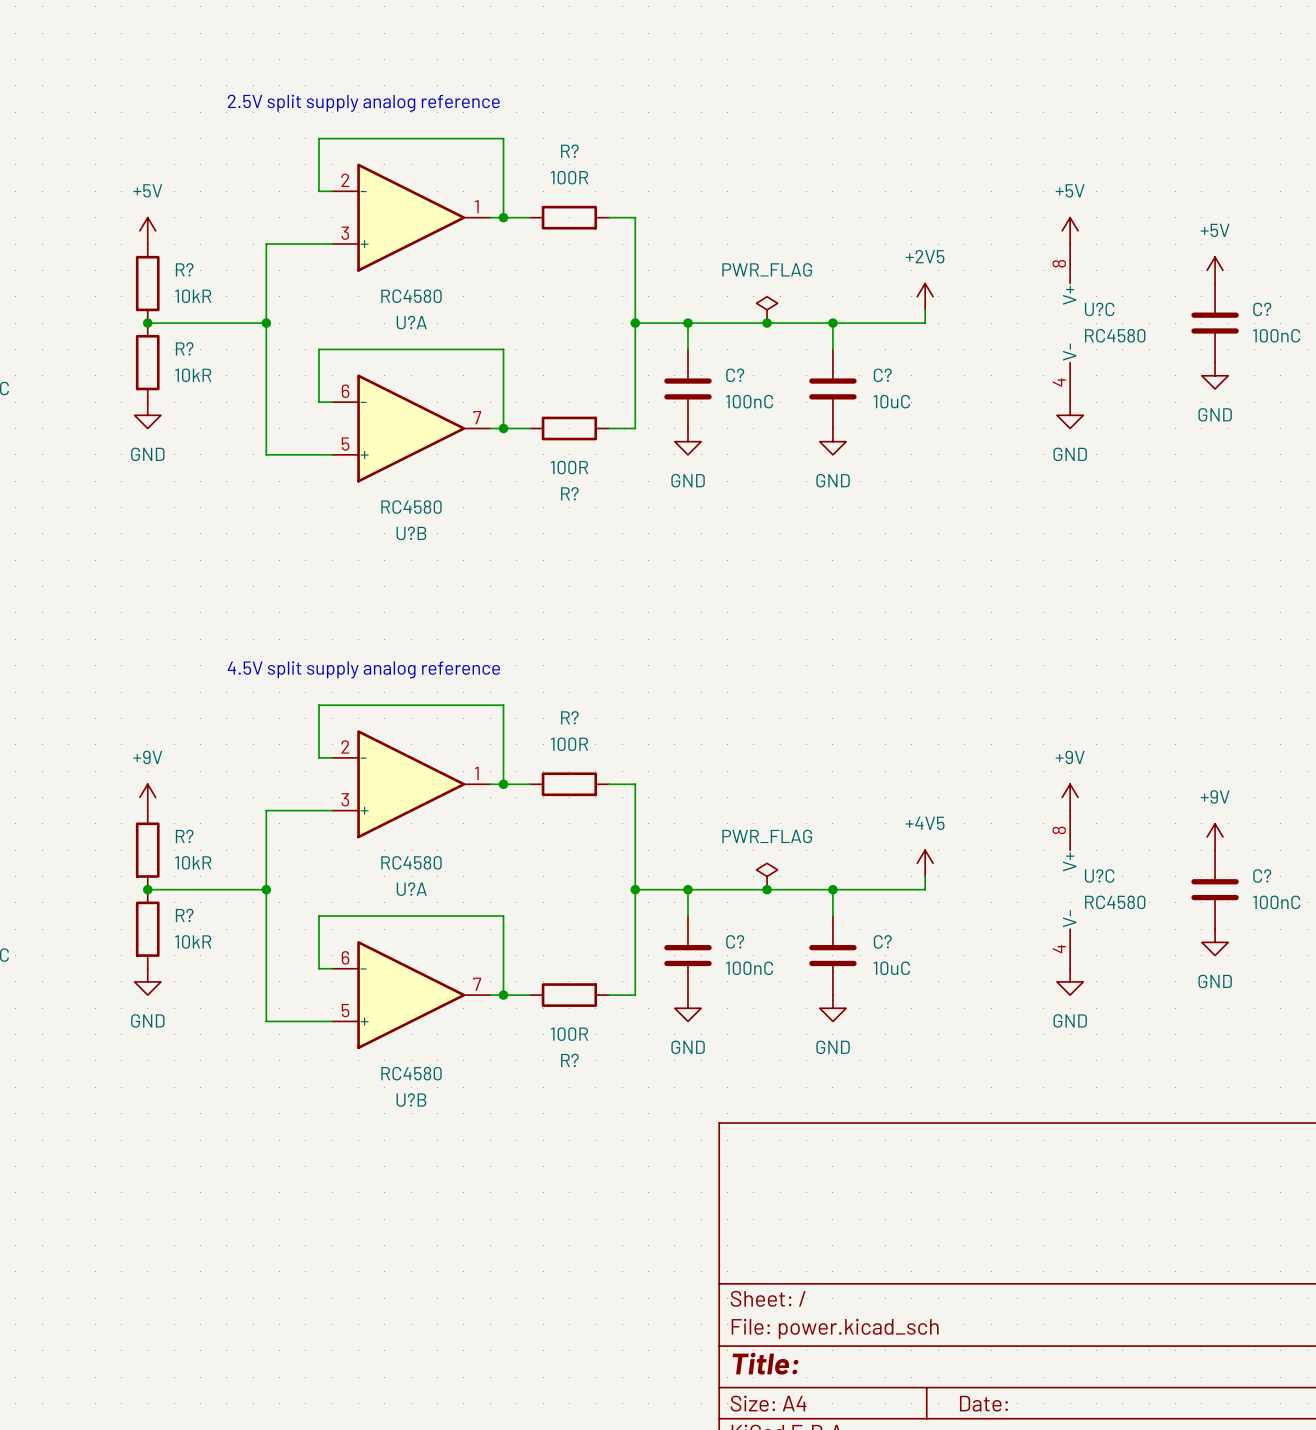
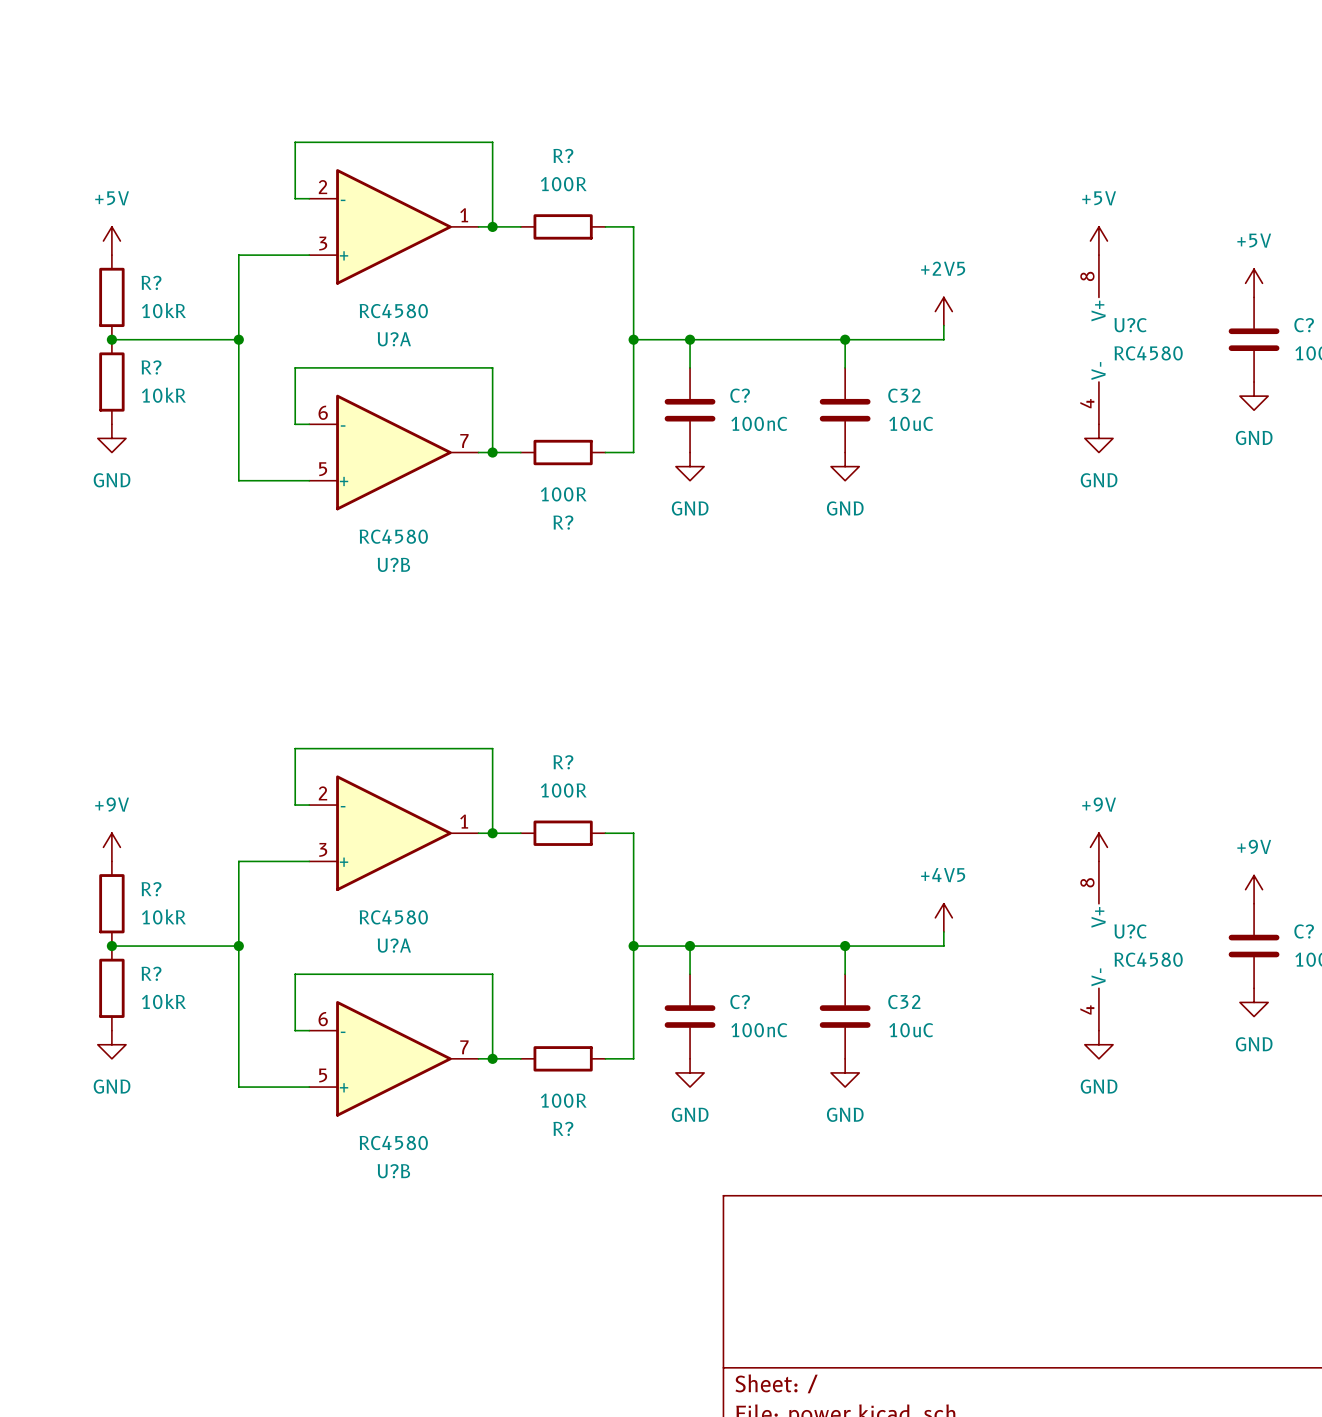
text: 2.5V split supply analog reference (363, 103) -> none
power symbol: PWR_FLAG (767, 309) -> none
junction: (767, 323) -> none
C? name: C? (882, 375) -> C32 (904, 395)
text: 4.5V split supply analog reference (363, 669) -> none
power symbol: PWR_FLAG (767, 876) -> none
junction: (767, 889) -> none
C? name: C? (882, 941) -> C32 (904, 1002)

